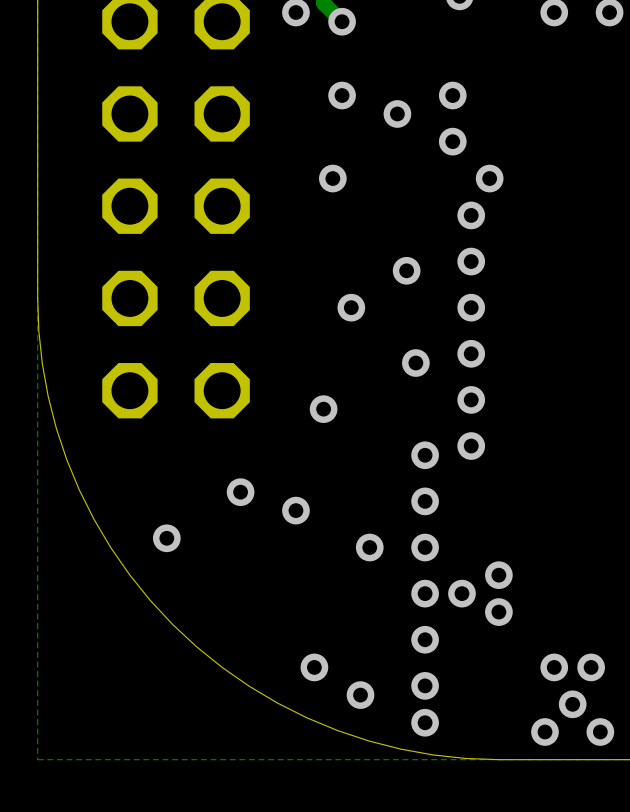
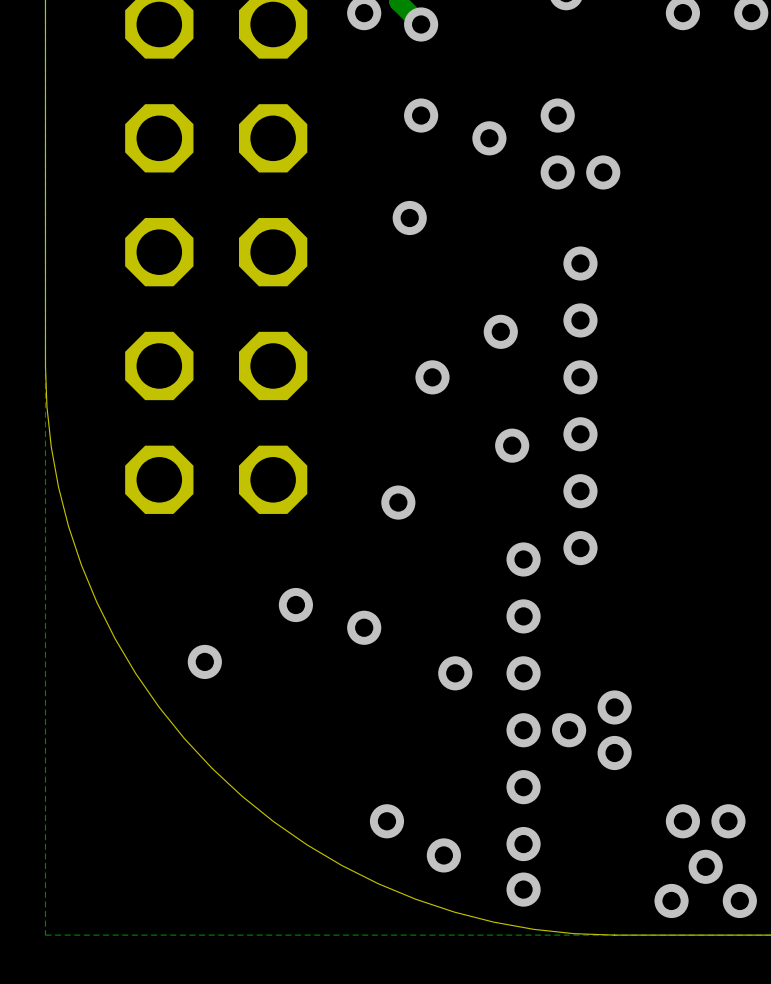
via position: (489, 178) -> (603, 172)

